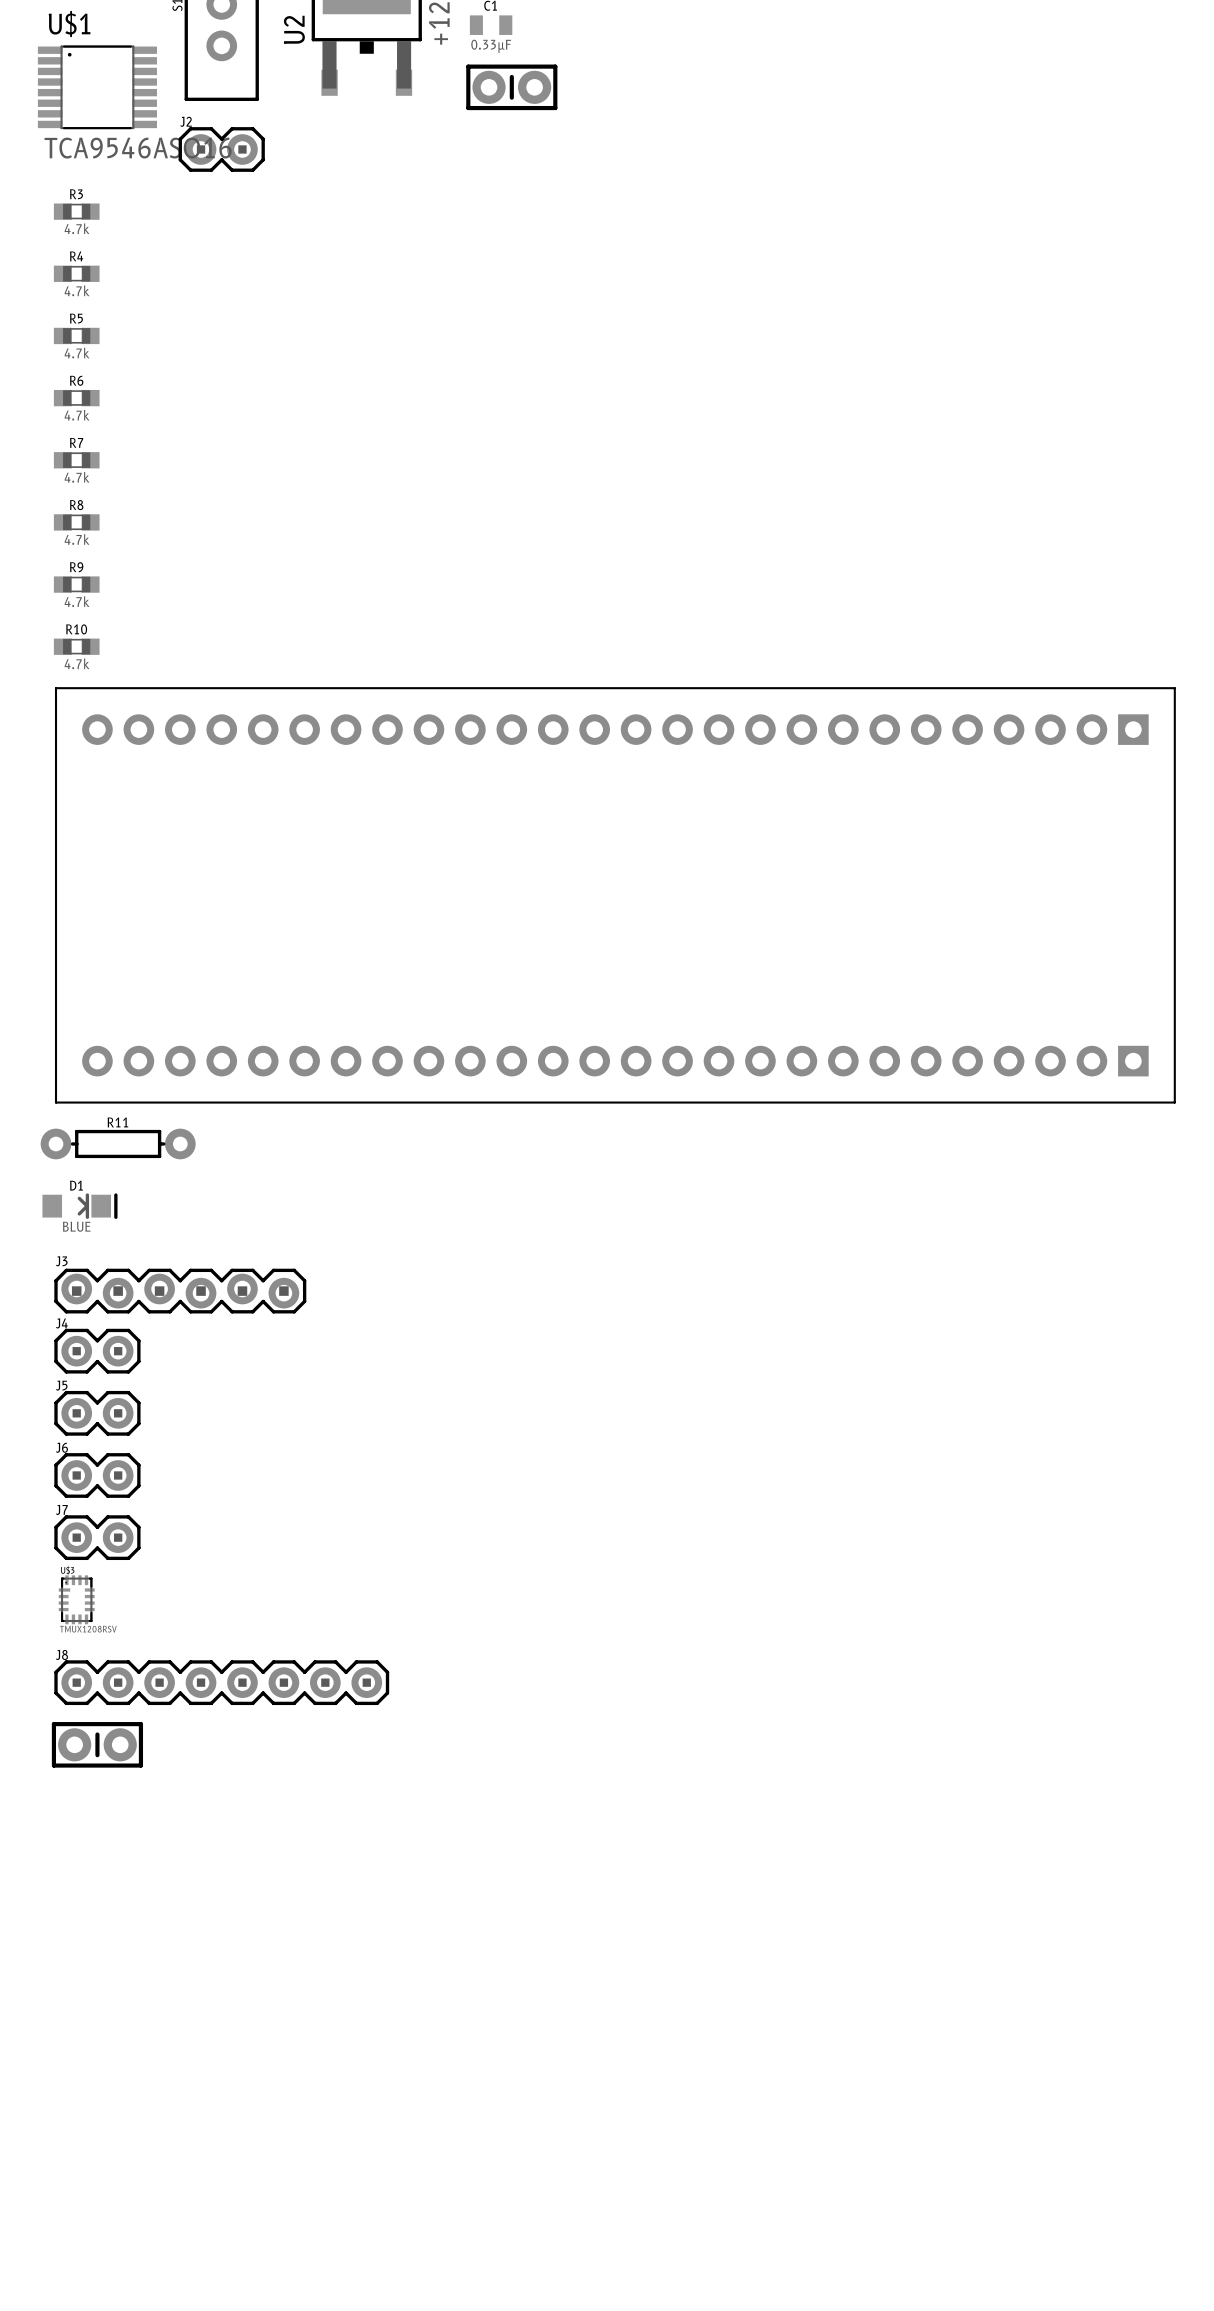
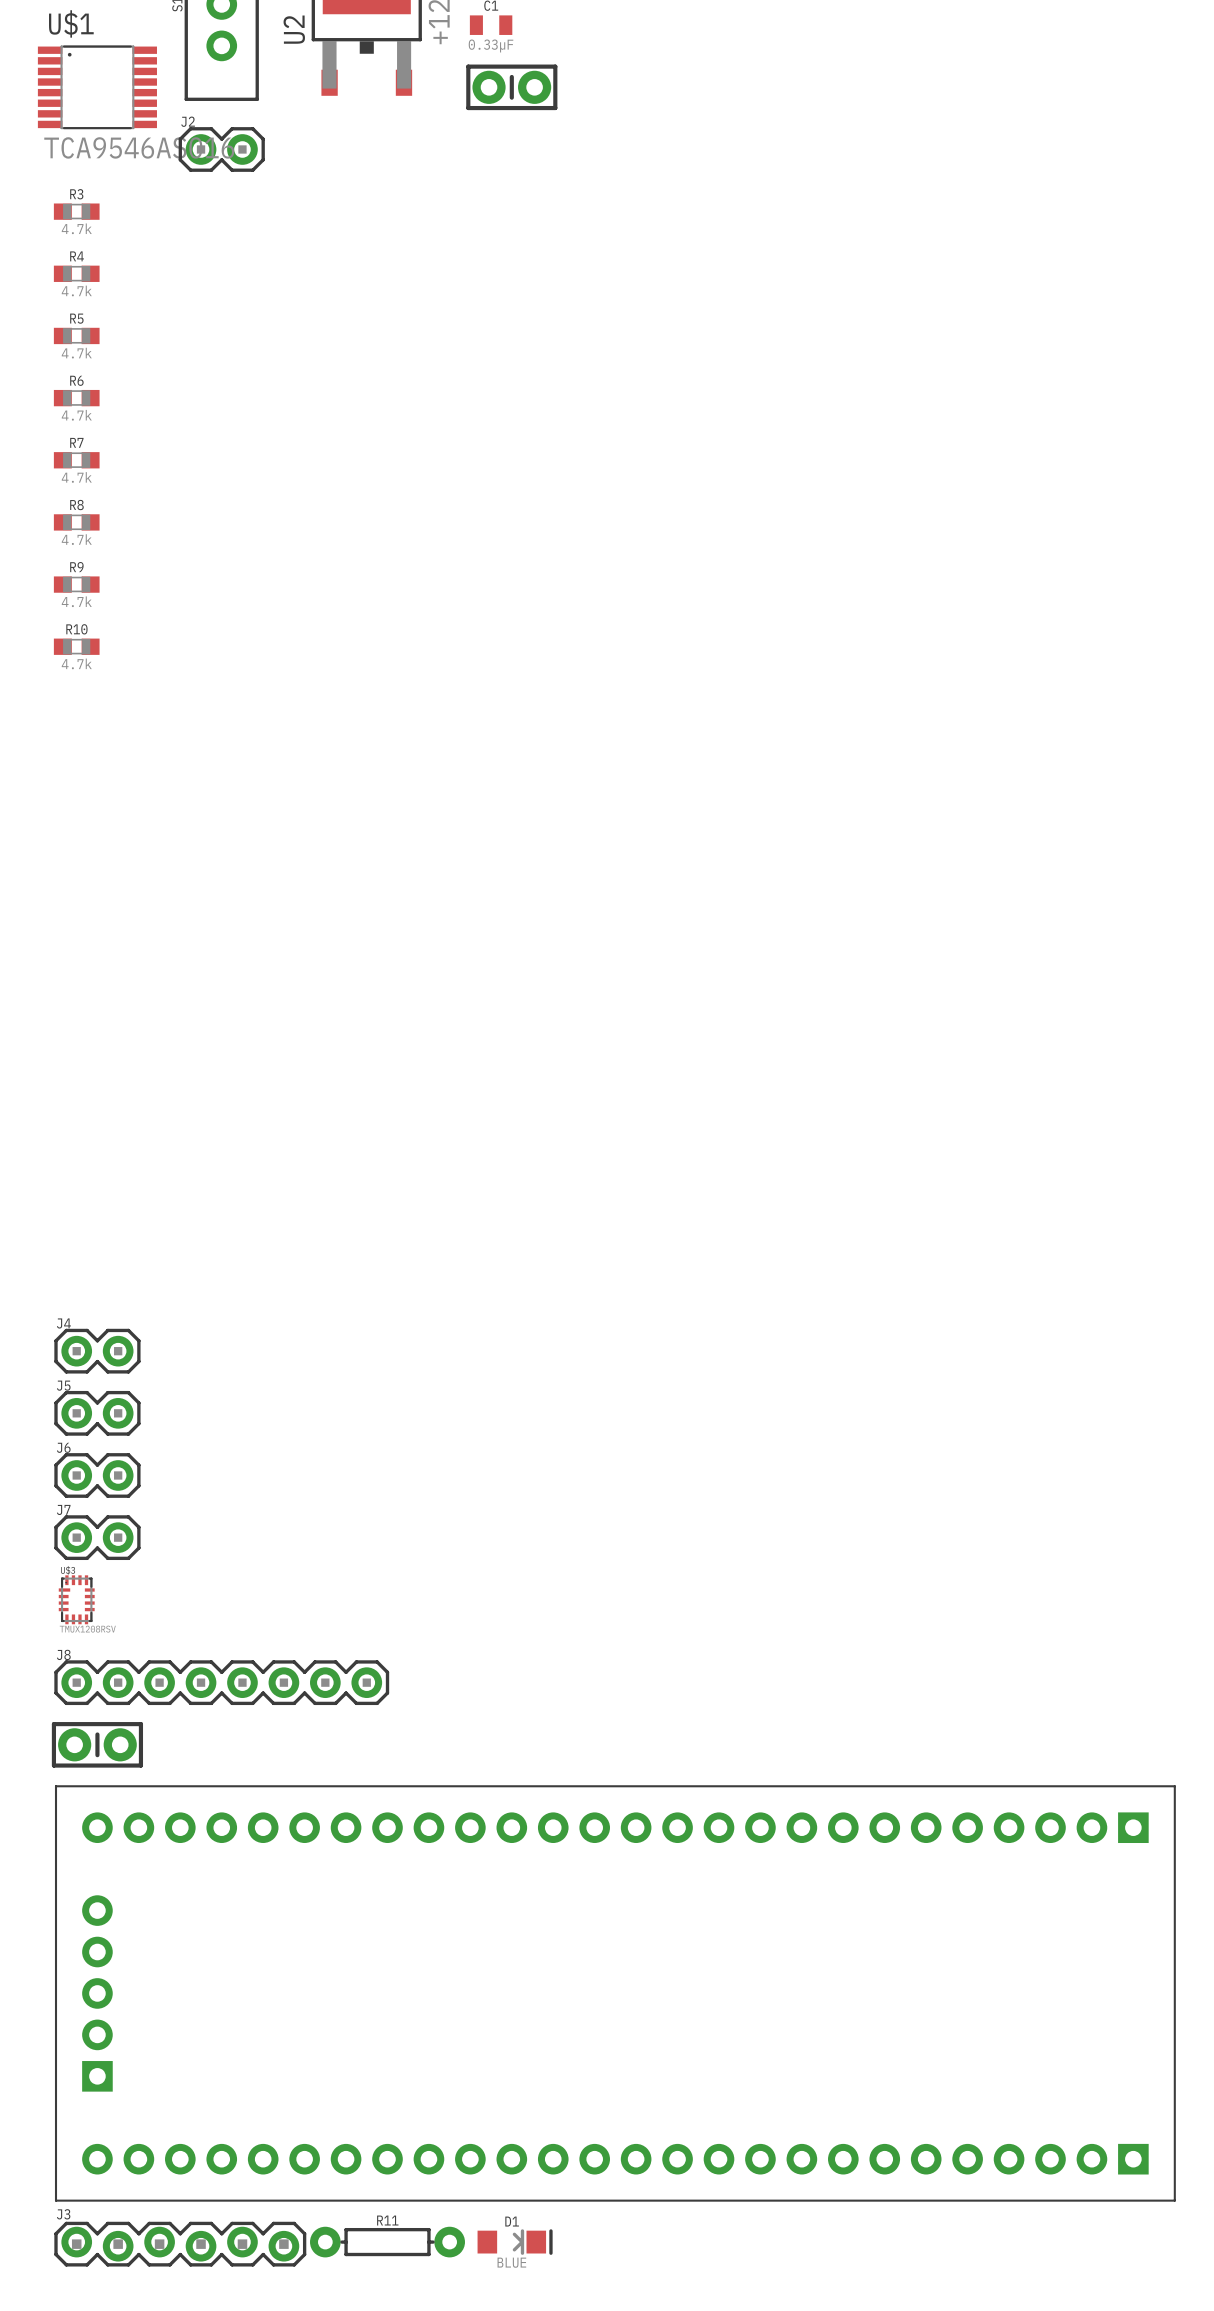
part: (615, 895) -> none
R11 position: (118, 1143) -> (387, 2242)
D1 position: (80, 1206) -> (515, 2242)
J3 position: (180, 1291) -> (180, 2244)
part: none -> (615, 1993)

